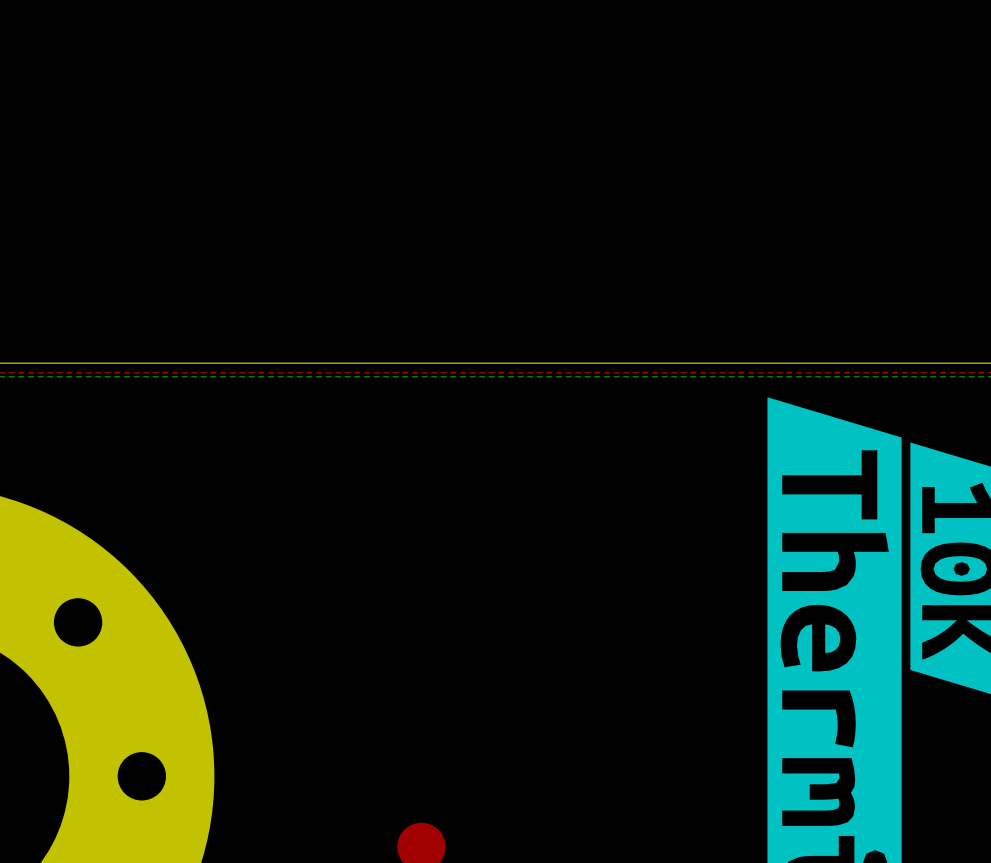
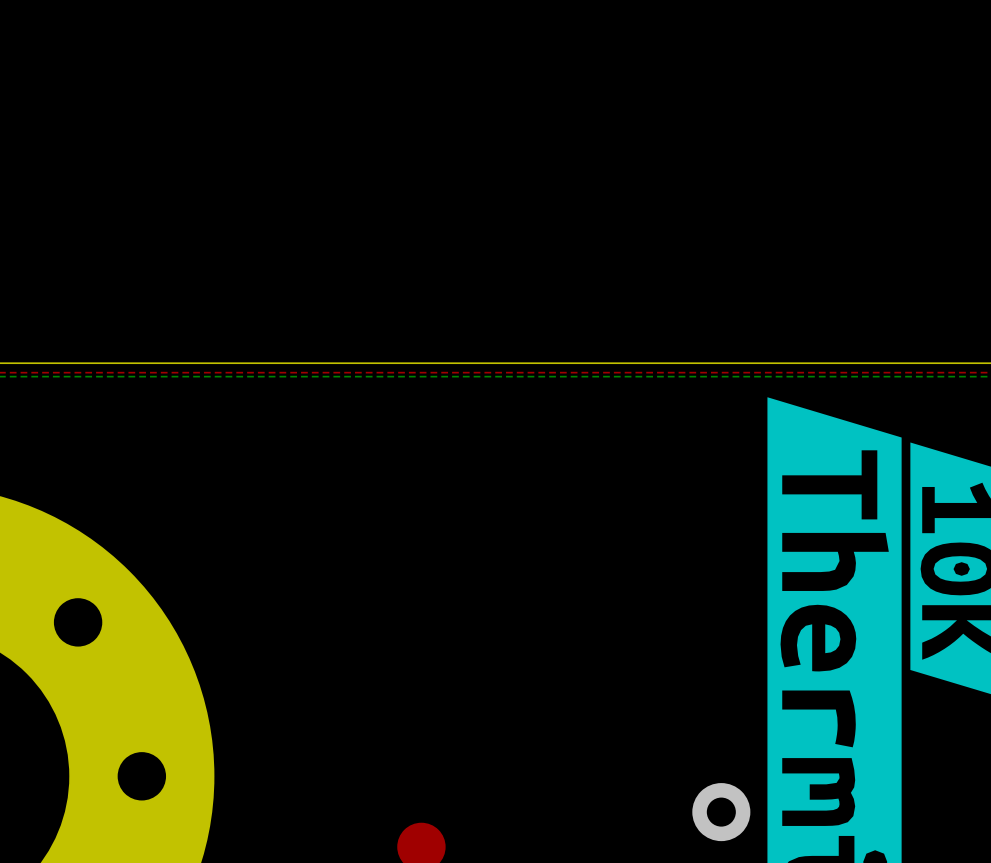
via: none -> (721, 812)

